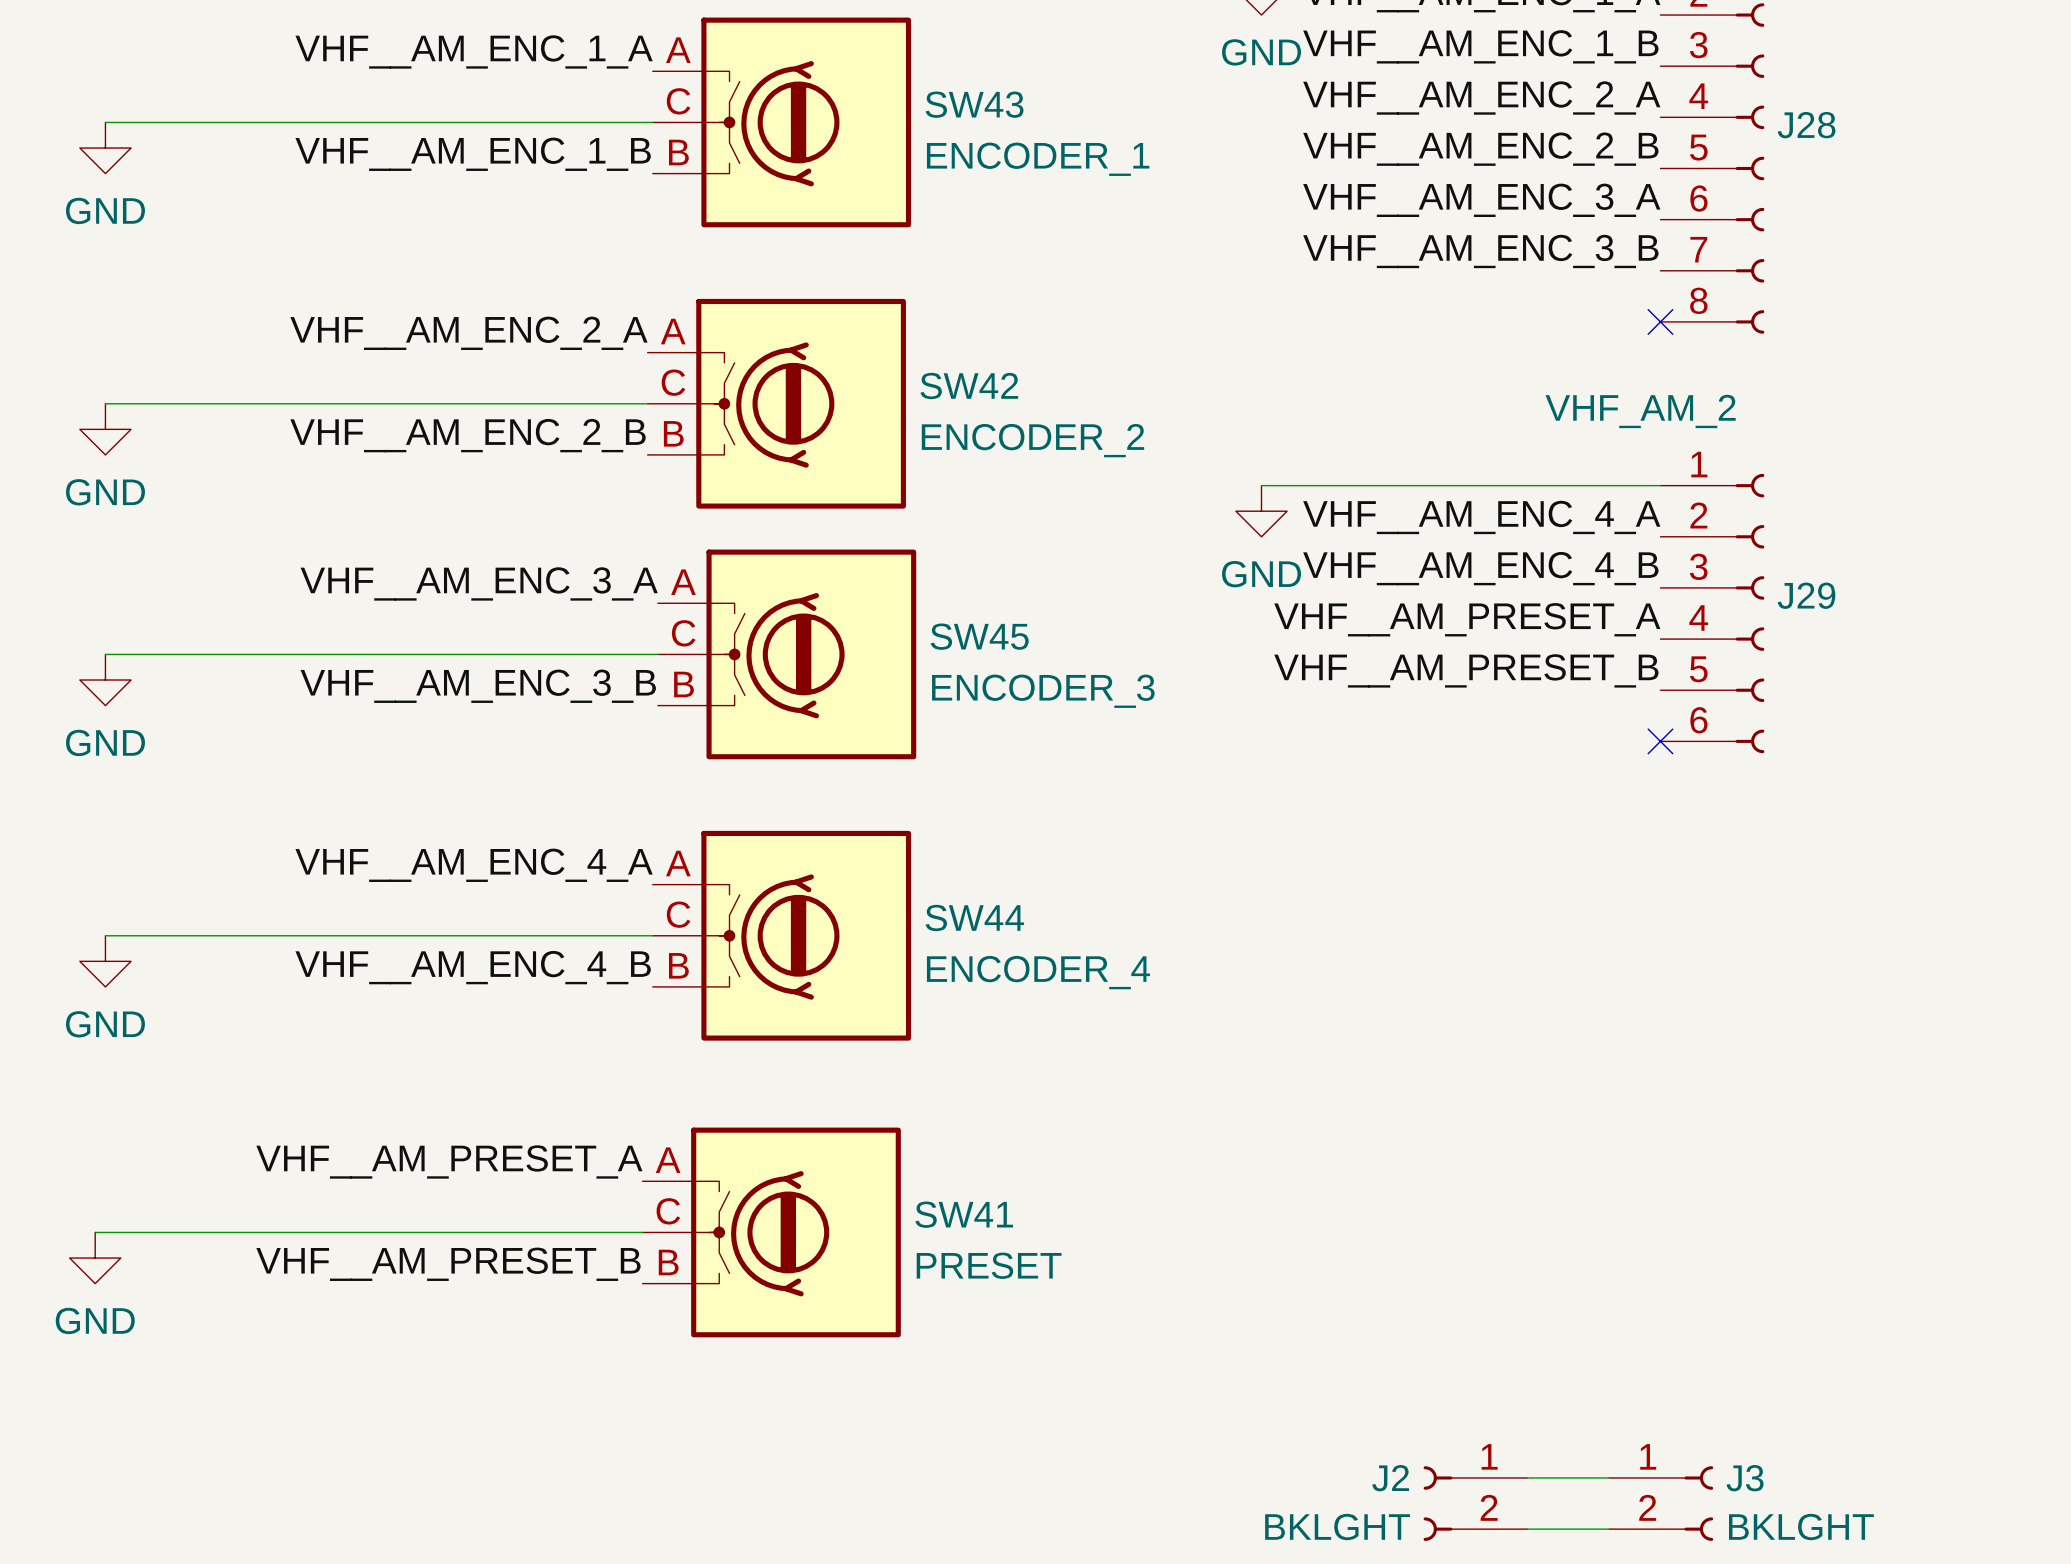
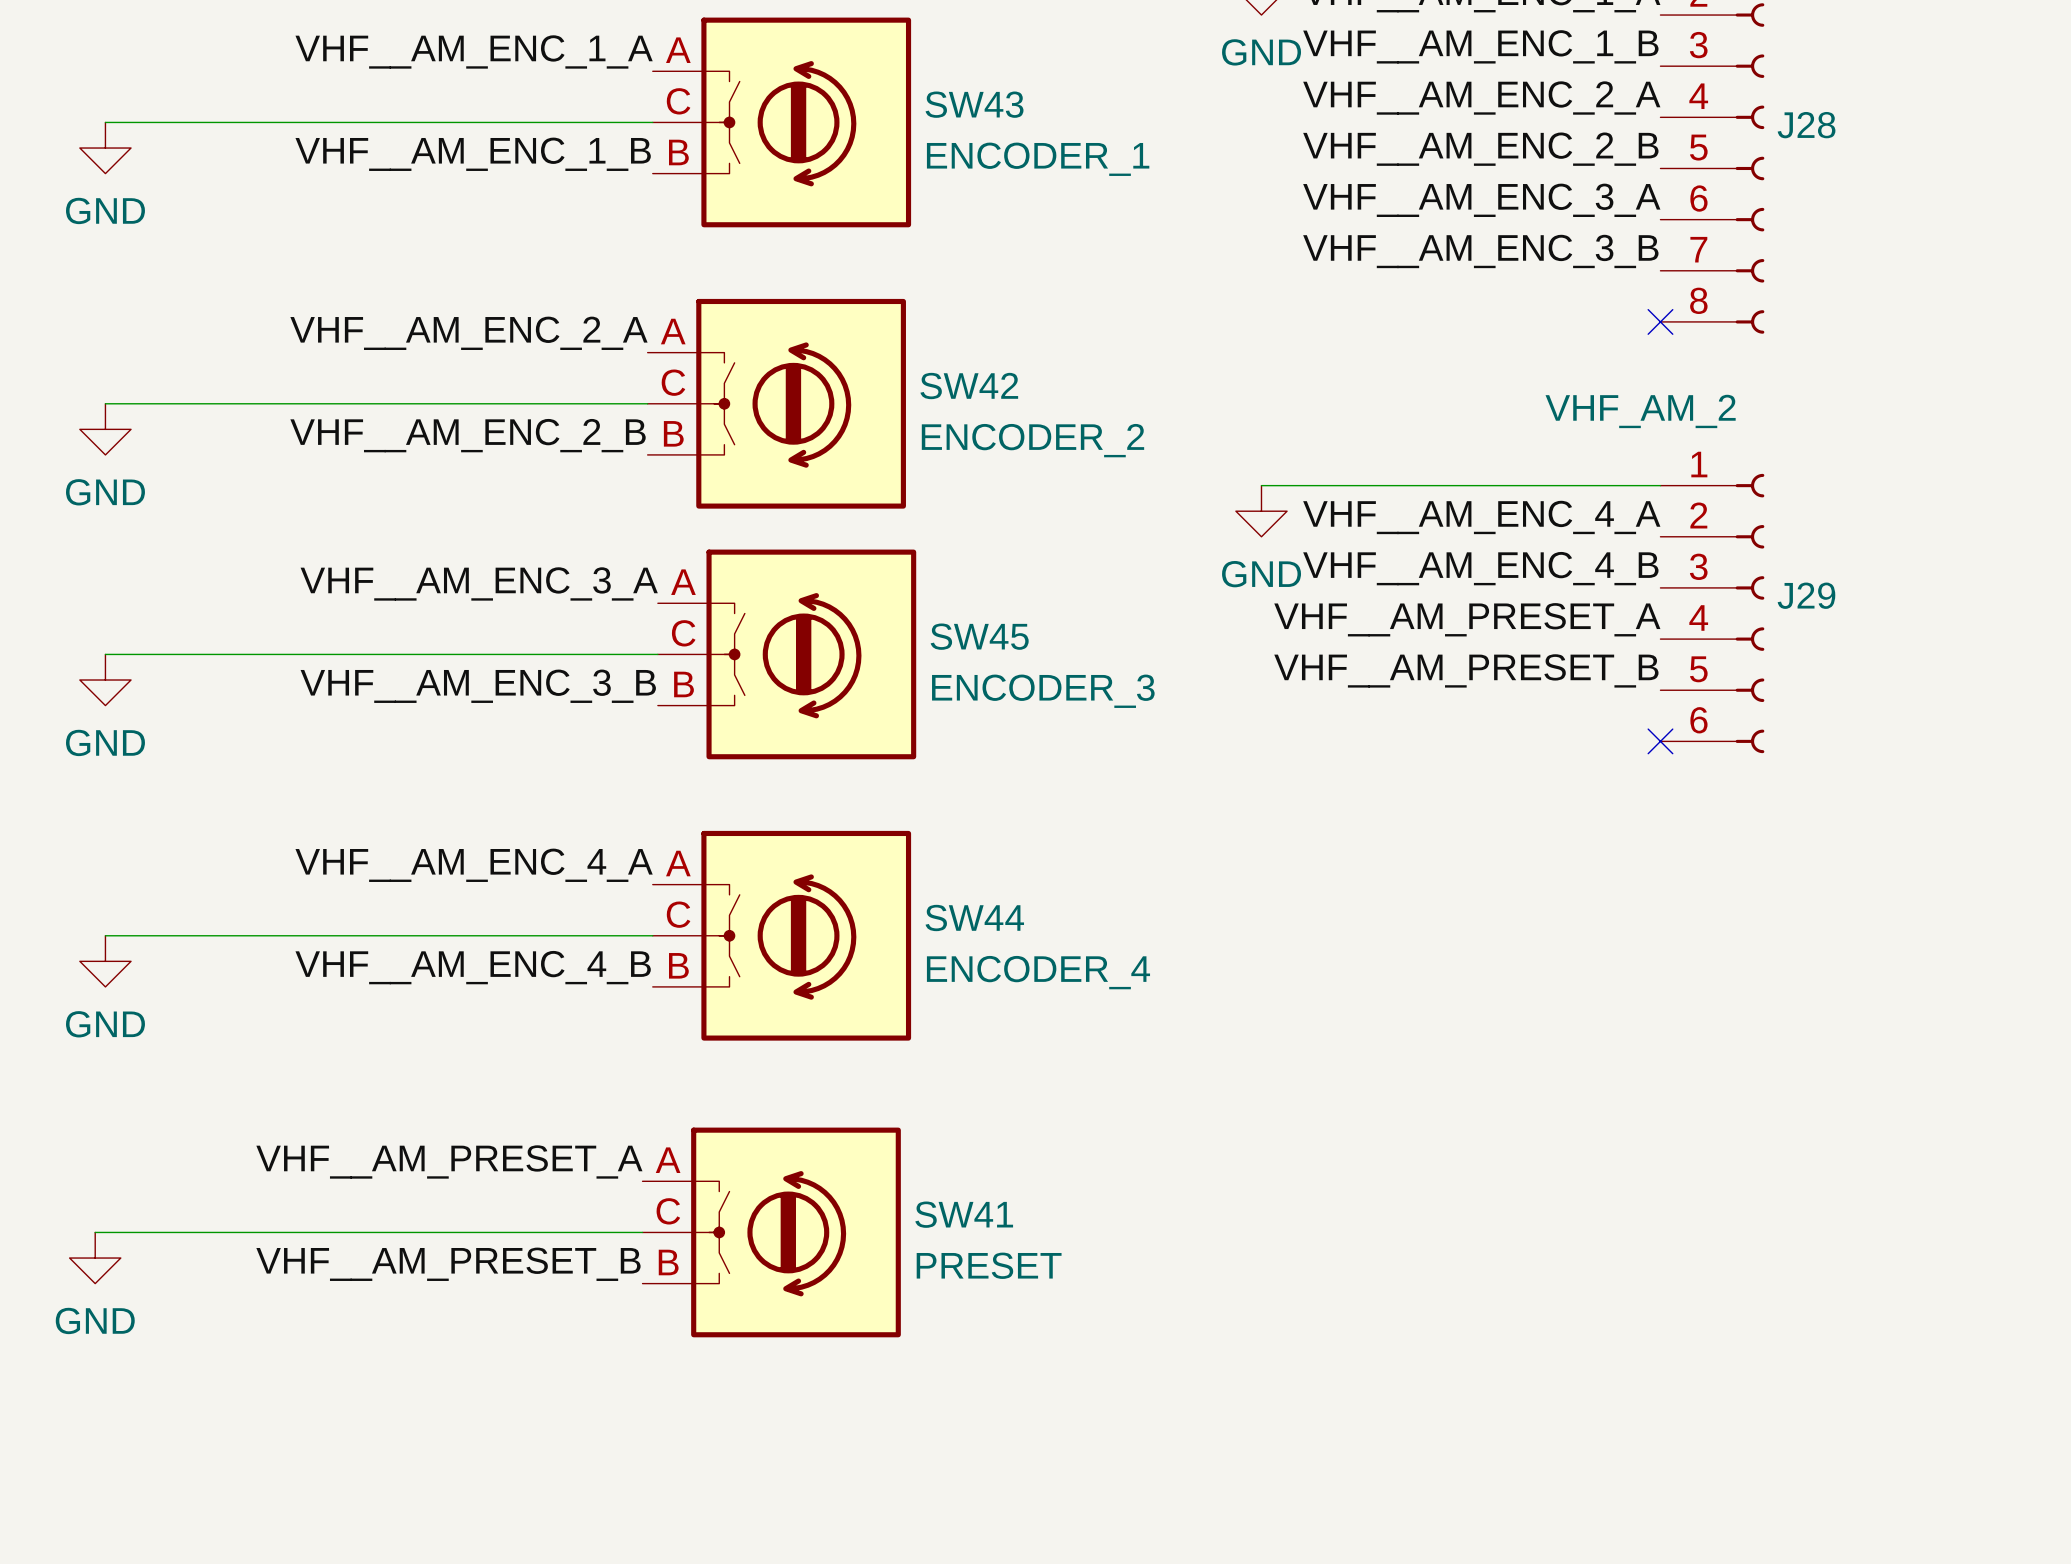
SW43 symbol: [652, 17, 912, 228] -> [652, 17, 912, 228]
SW42 symbol: [647, 298, 906, 509] -> [647, 298, 906, 509]
SW45 symbol: [657, 549, 917, 760] -> [657, 549, 917, 760]
SW44 symbol: [652, 830, 912, 1041] -> [652, 830, 912, 1041]
SW41 symbol: [642, 1127, 901, 1338] -> [642, 1127, 901, 1338]
wire: (1527, 1477) (1609, 1477) -> none
J2: BKLGHT (1475, 1503) -> none
J3: BKLGHT (1661, 1503) -> none
wire: (1527, 1529) (1609, 1529) -> none

